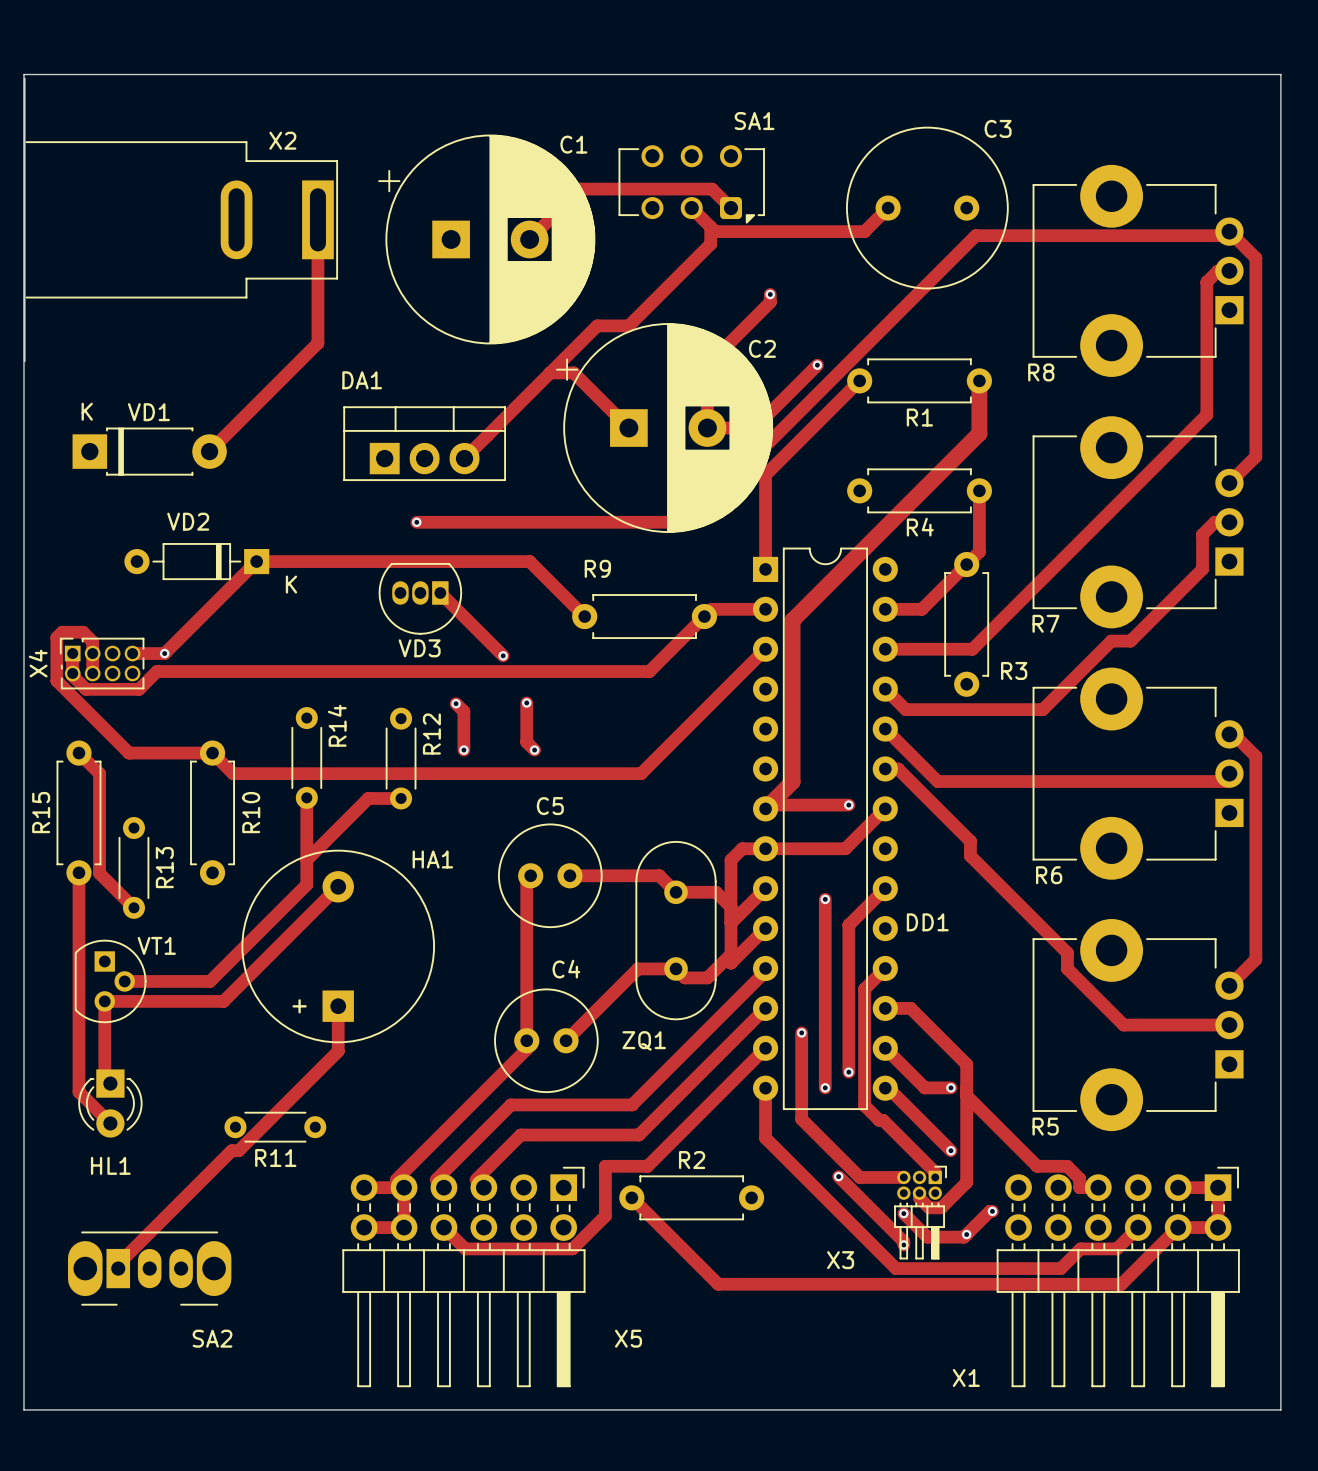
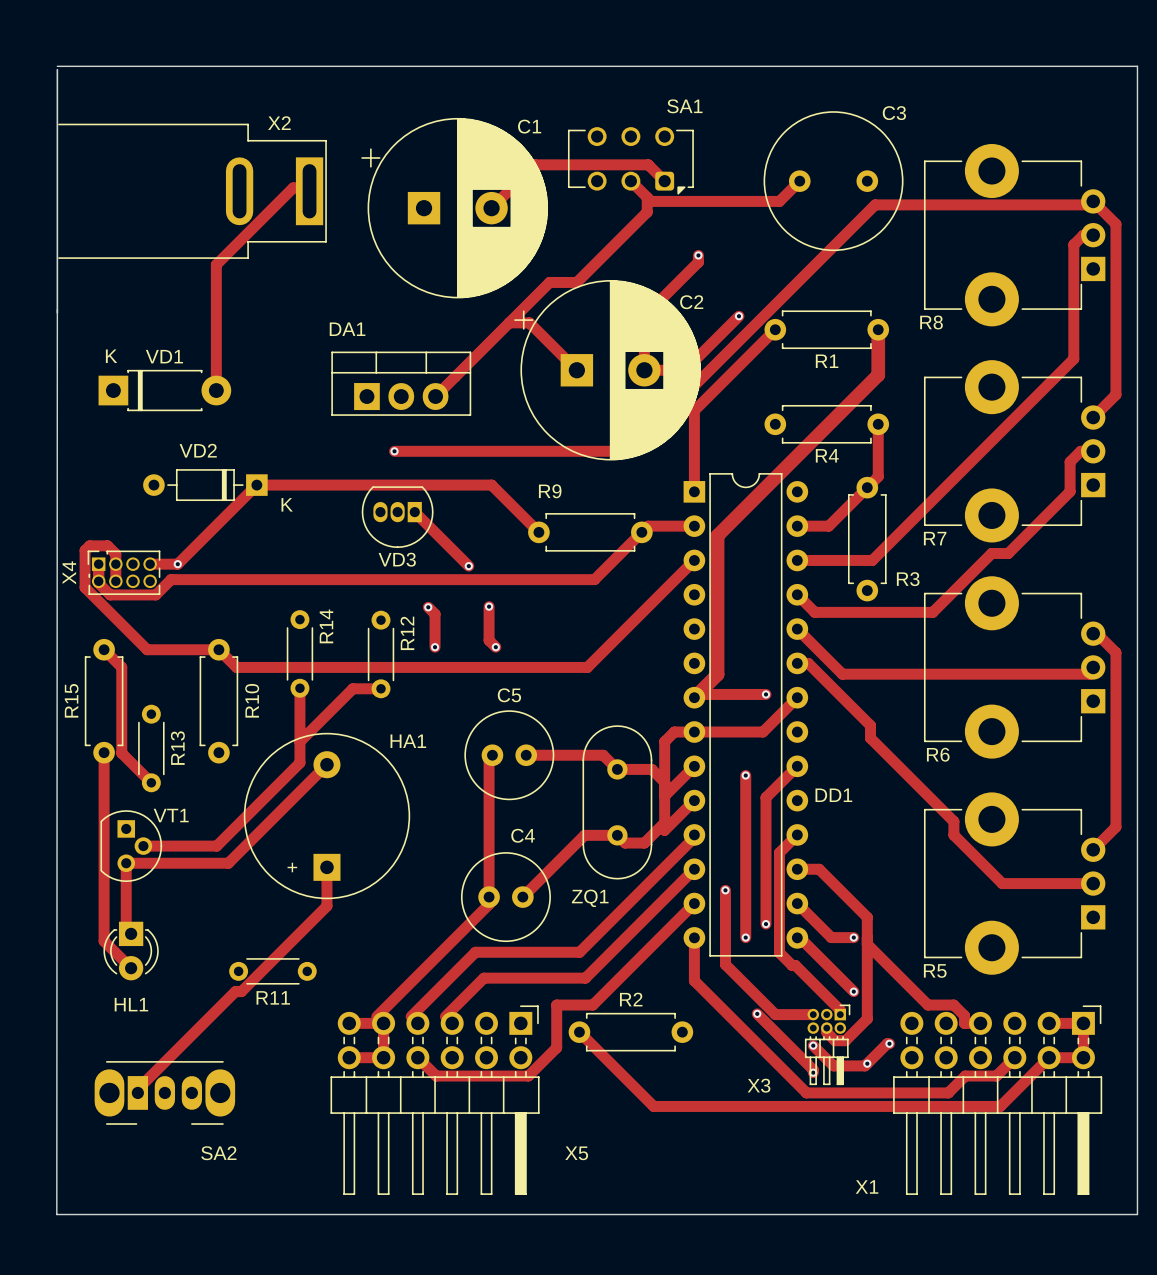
board edge: (24, 74) (23, 1409) -> (57, 309) (56, 1214)
track: (317, 219) (317, 343) (209, 451) -> (309, 187) (293, 187) (216, 264) (216, 390)

